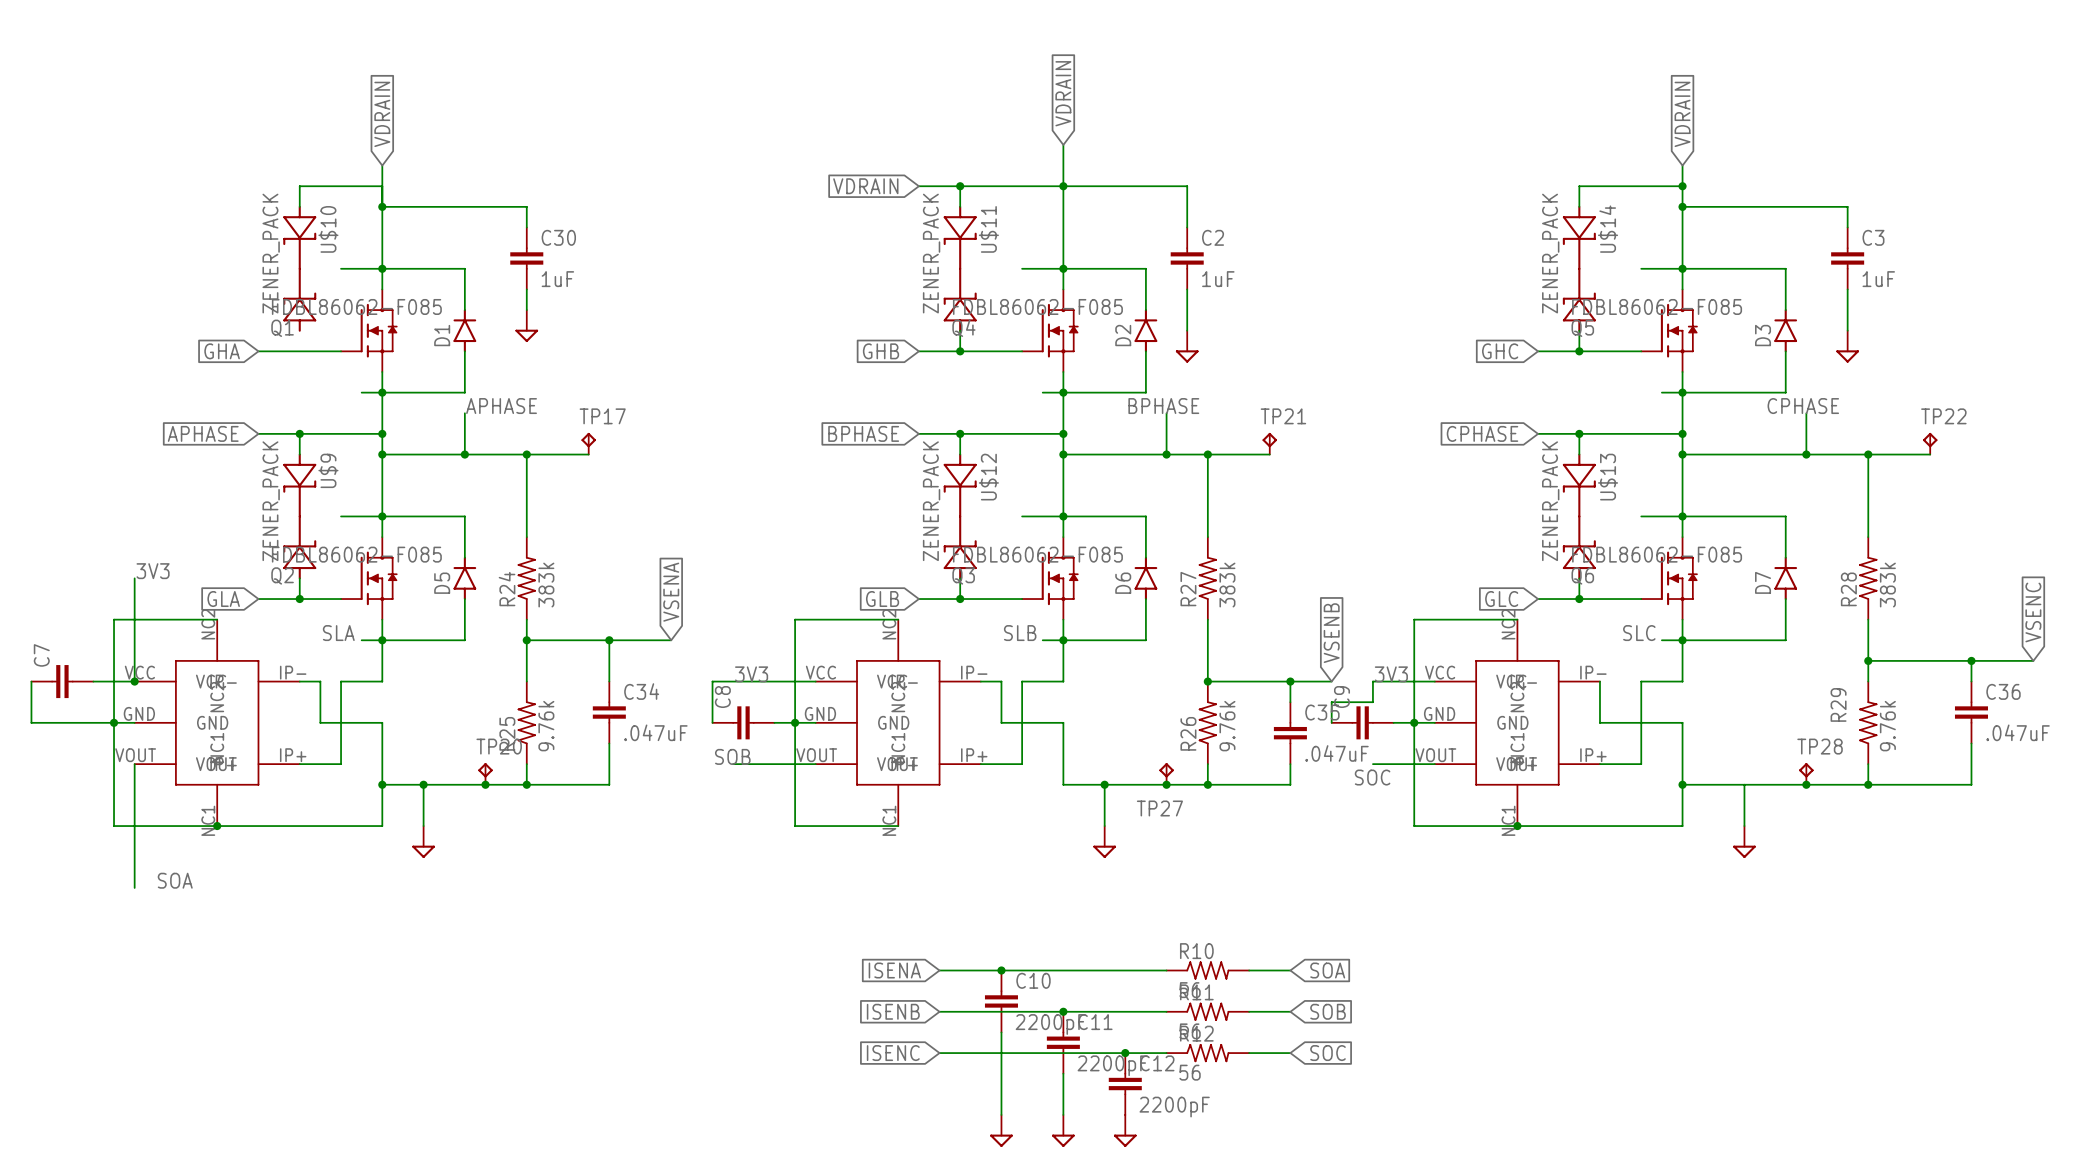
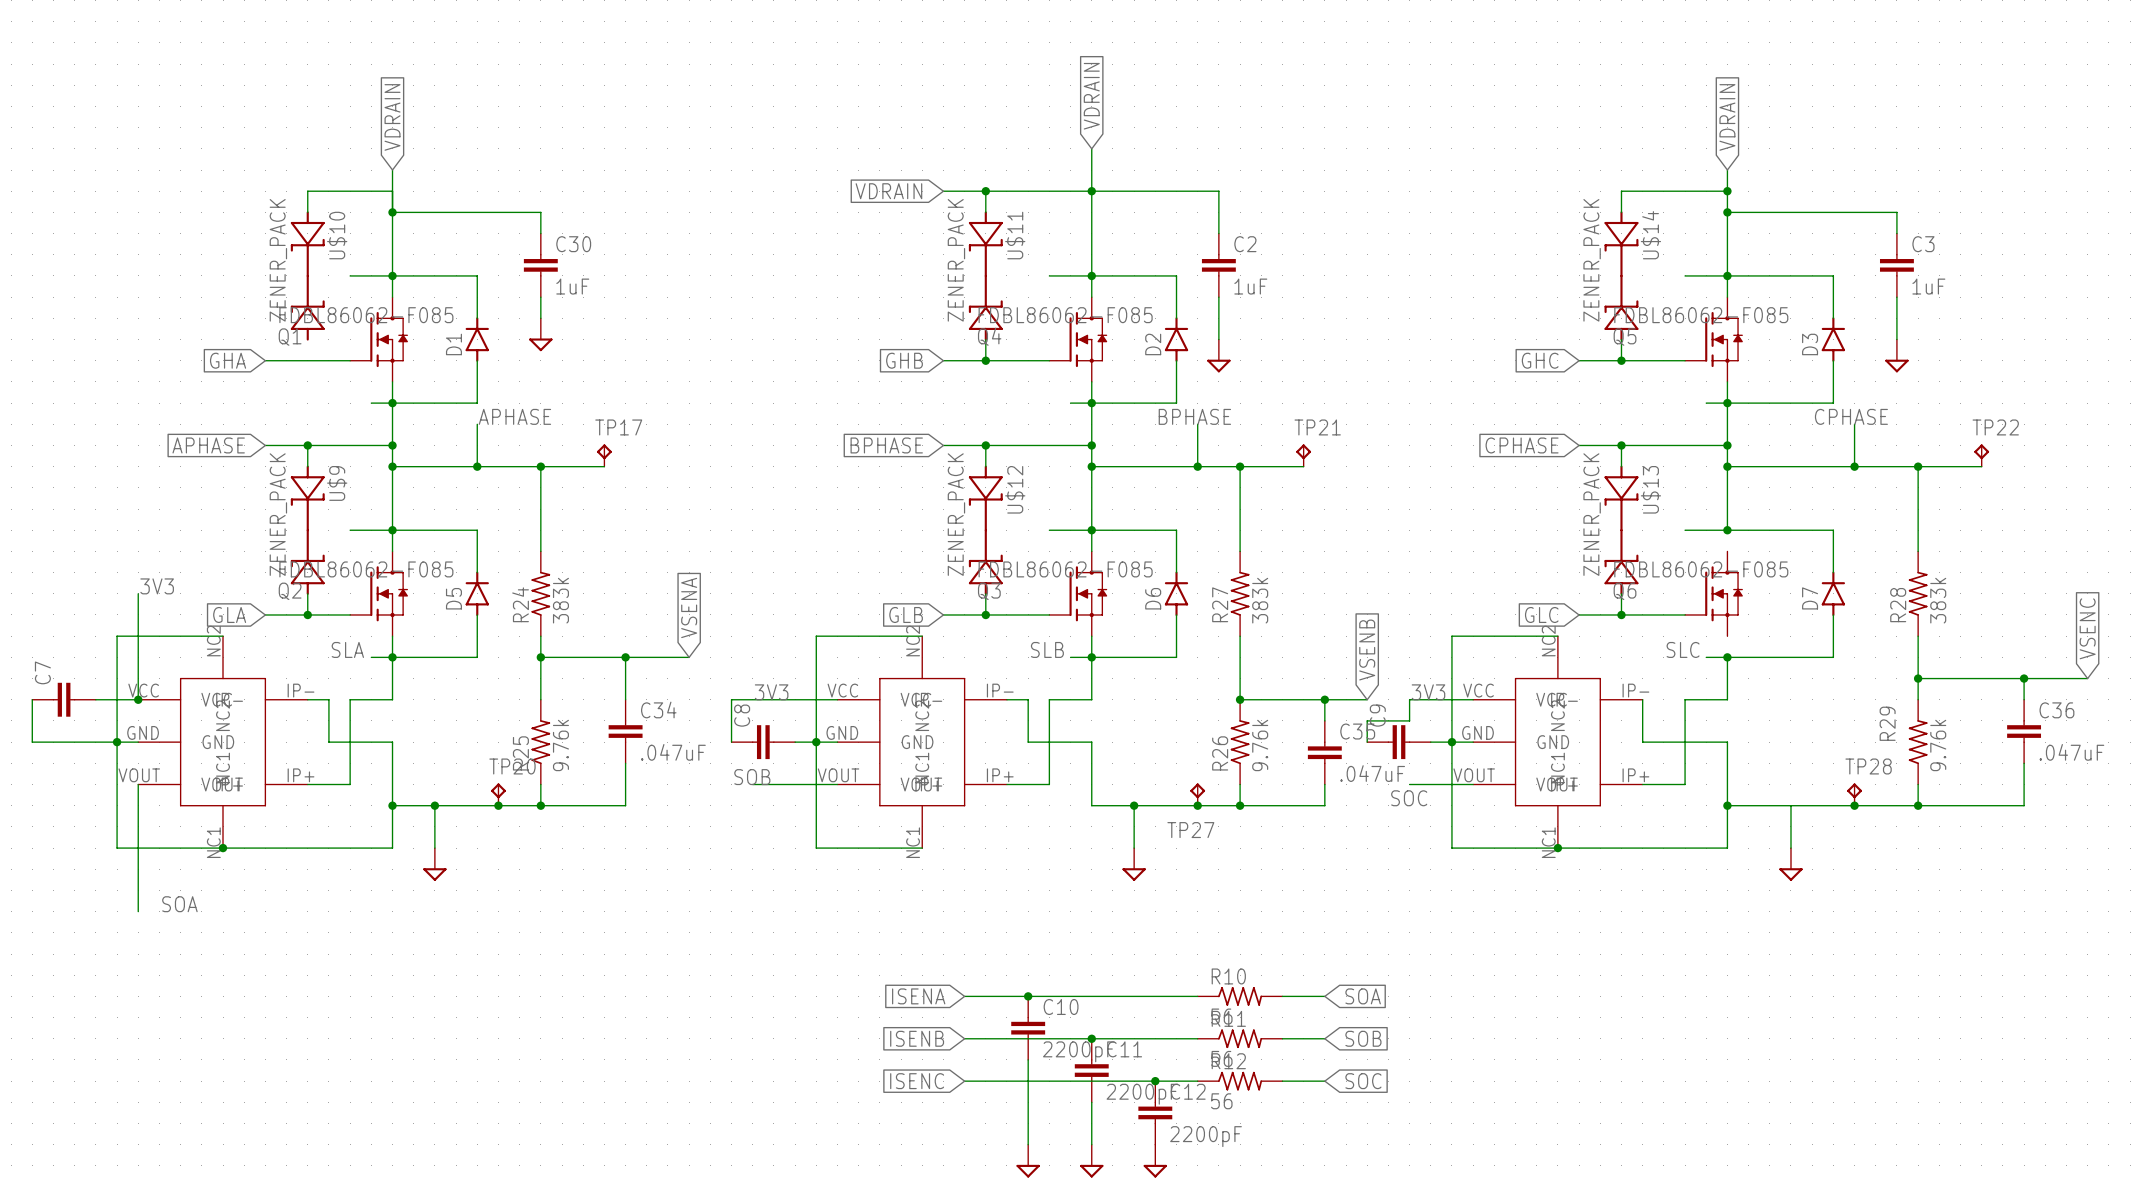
wire: (1682, 516) (1682, 537) -> none
wire: (1682, 619) (1682, 640) -> none

